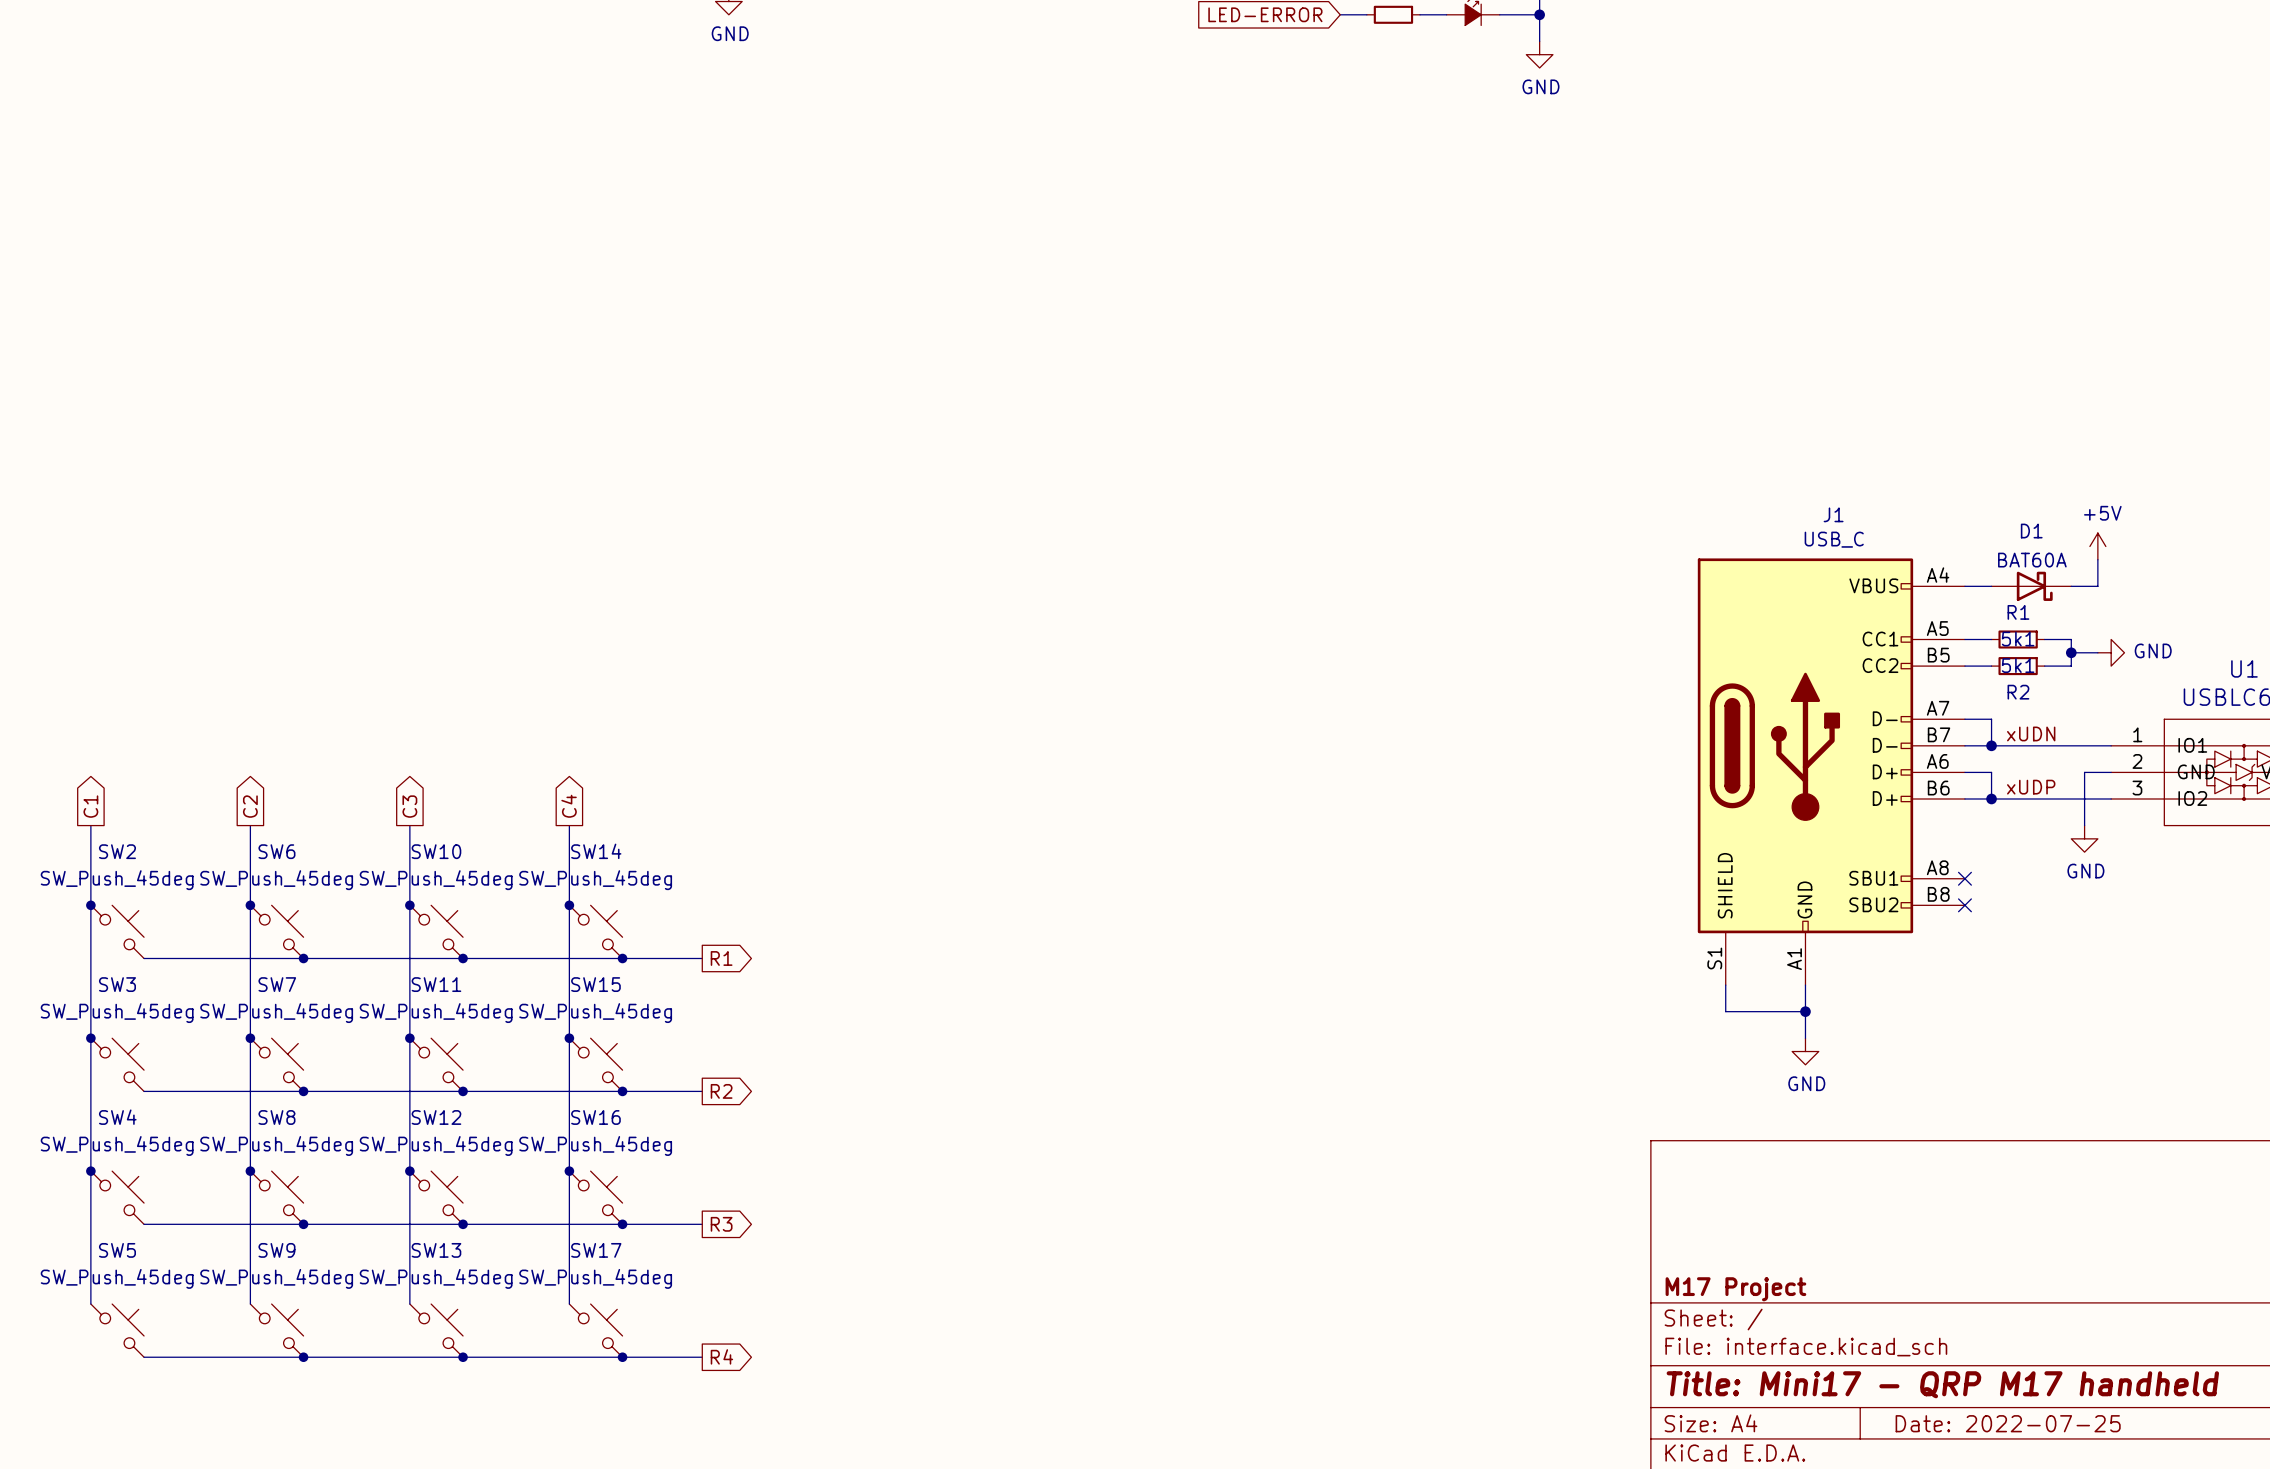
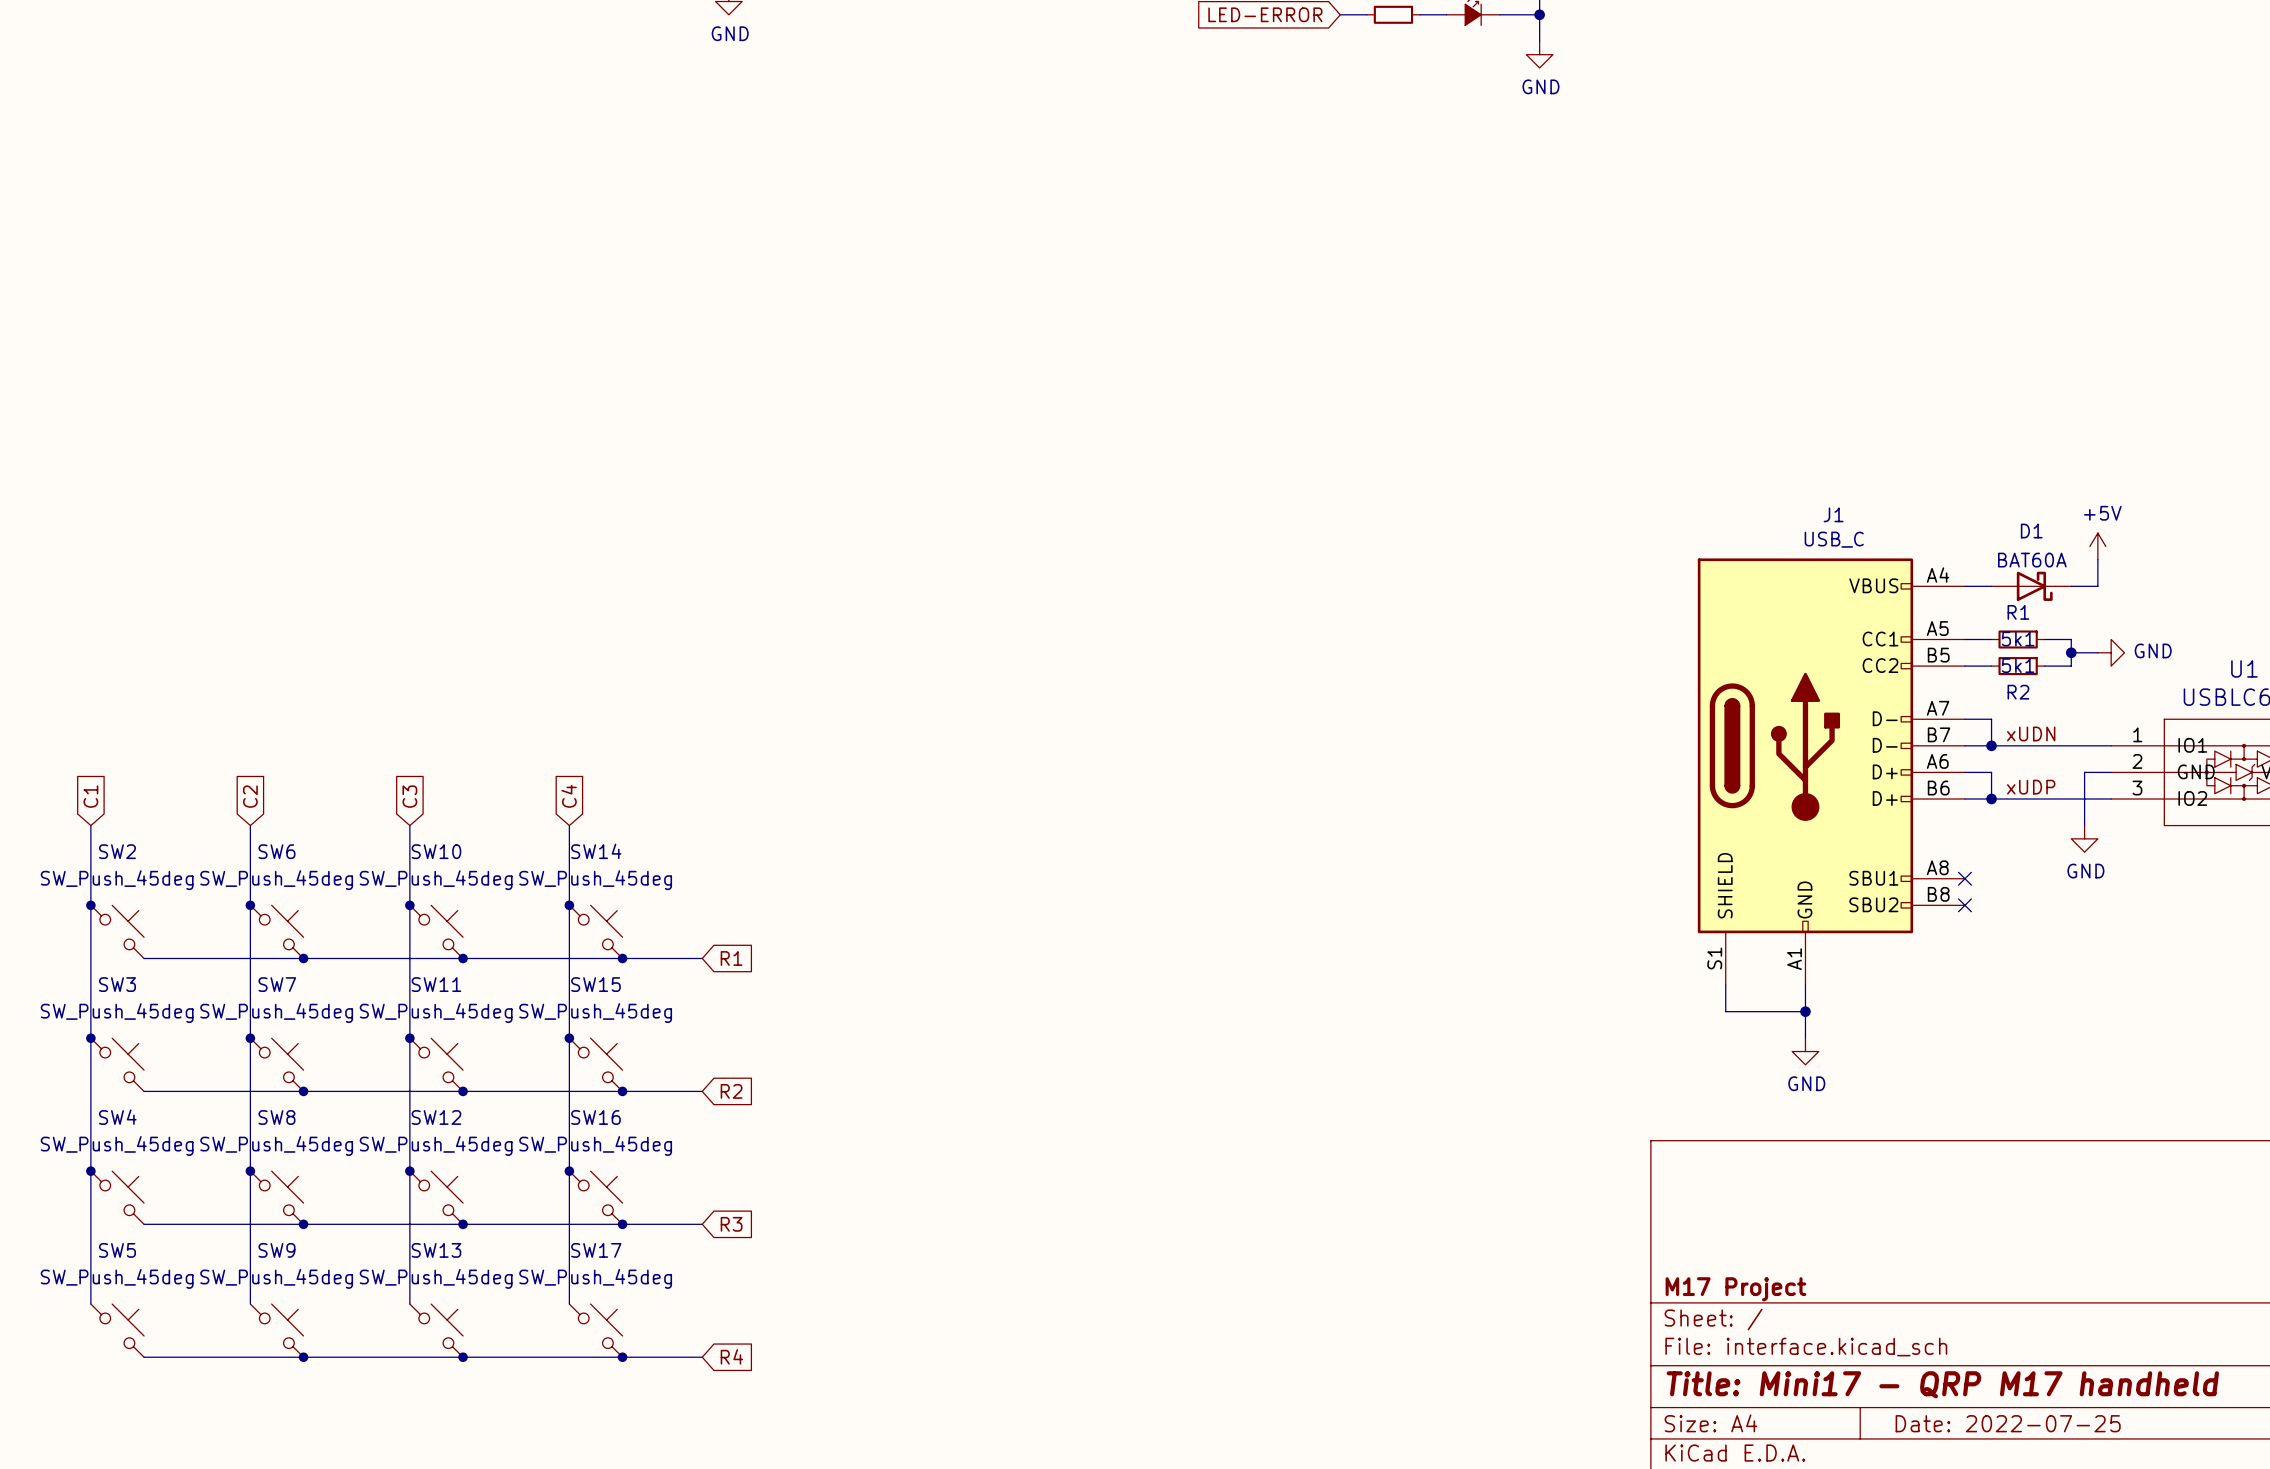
global label shape: output (90, 806) -> input (90, 796)
global label shape: output (250, 806) -> input (250, 796)
global label shape: output (409, 806) -> input (409, 796)
global label shape: output (569, 806) -> input (569, 796)
global label shape: output (721, 958) -> input (731, 958)
global label shape: output (721, 1091) -> input (731, 1091)
global label shape: output (721, 1224) -> input (731, 1224)
global label shape: output (721, 1356) -> input (731, 1356)

